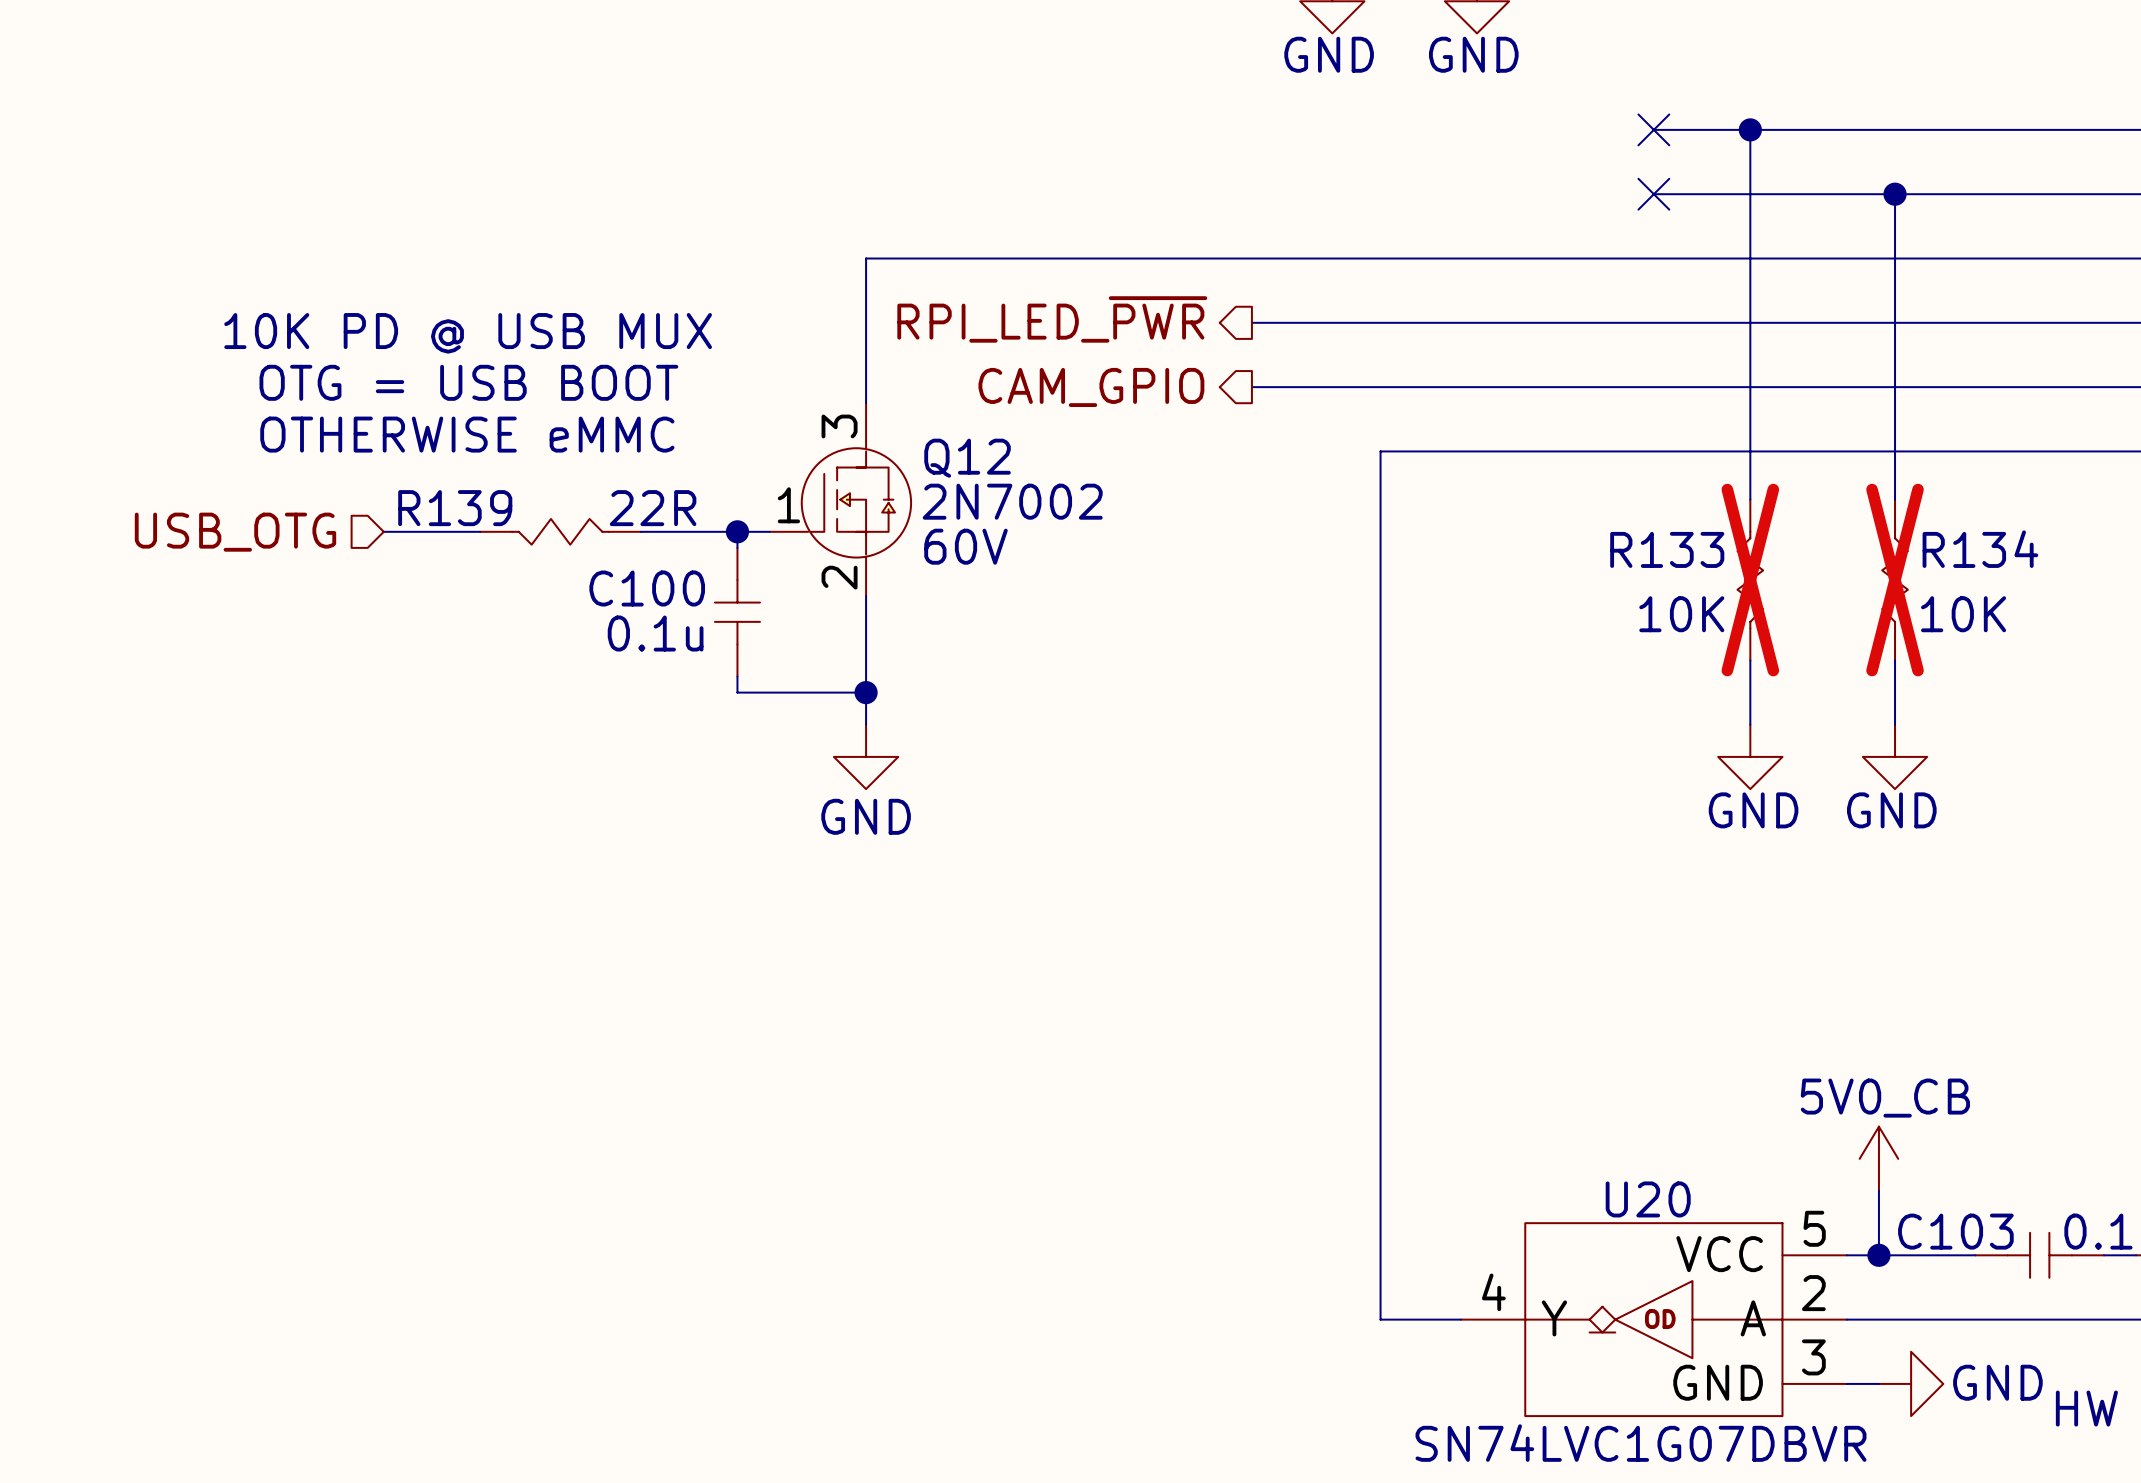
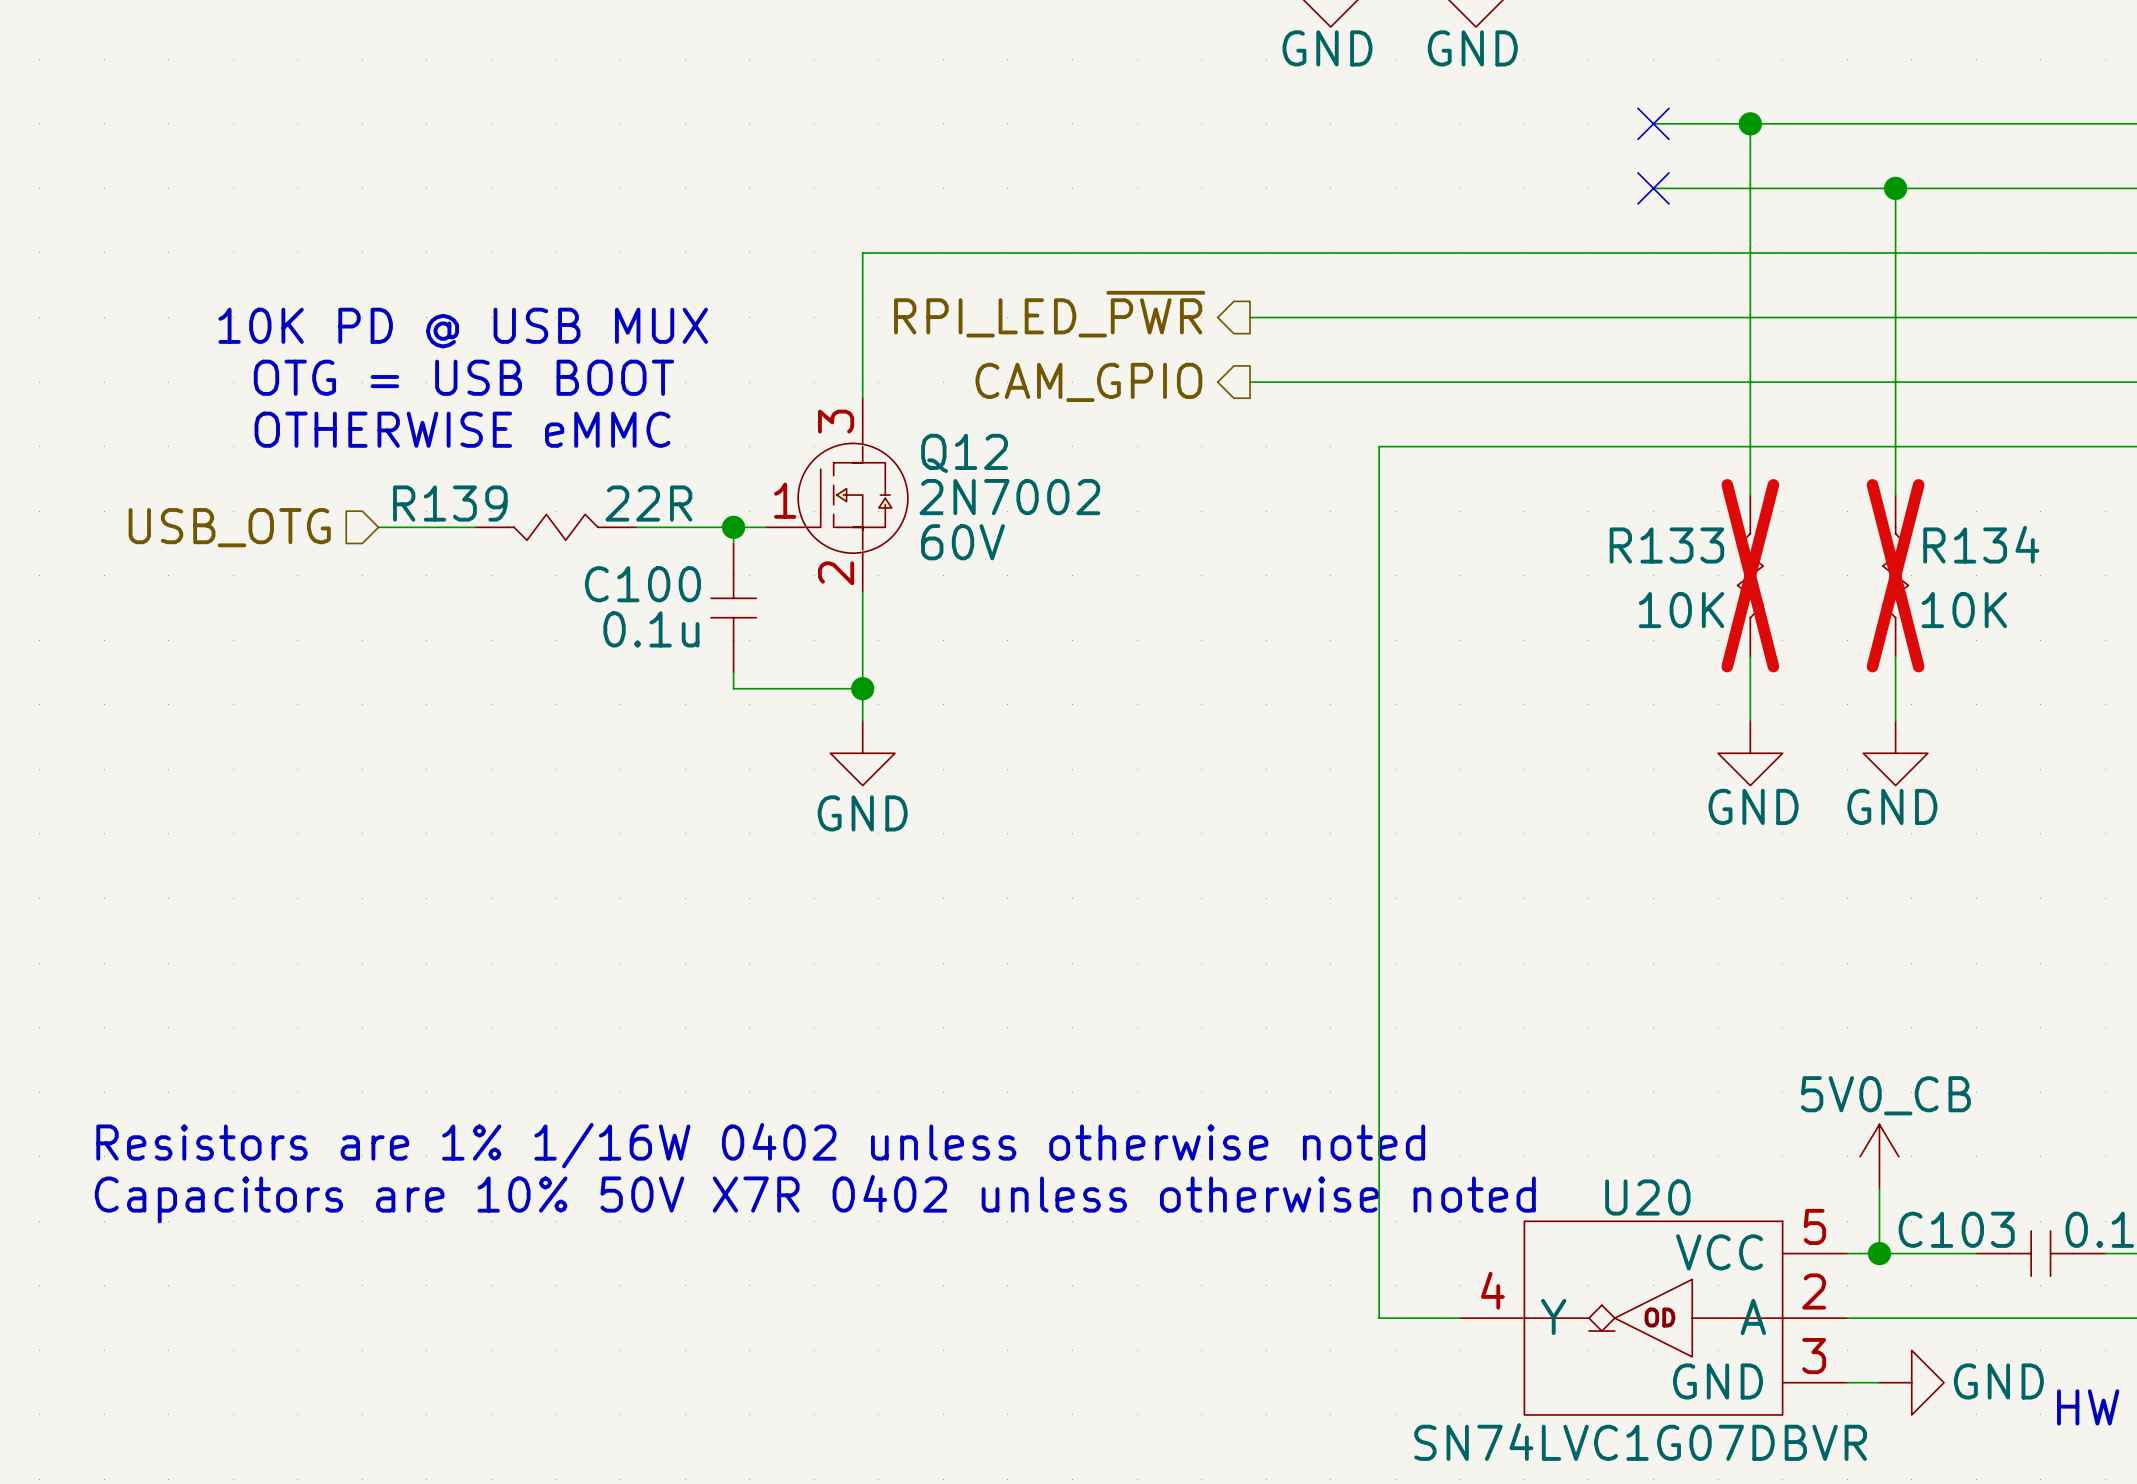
text: none -> Resistors are 1% 1/16W 0402 unless otherwise noted (760, 1145)
text: none -> Capacitors are 10% 50V X7R 0402 unless otherwise noted (815, 1199)

